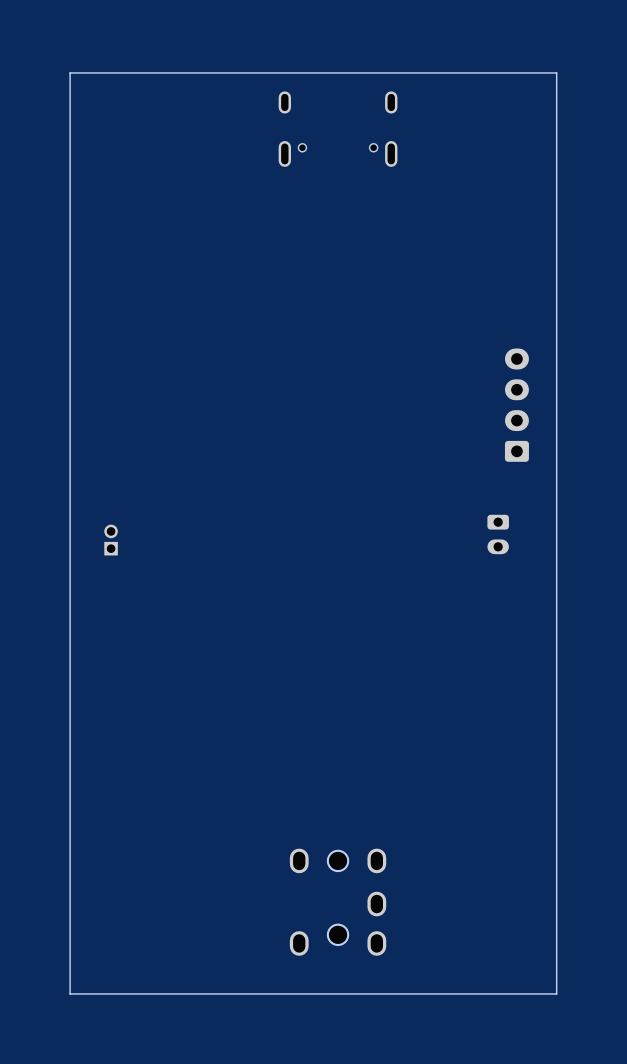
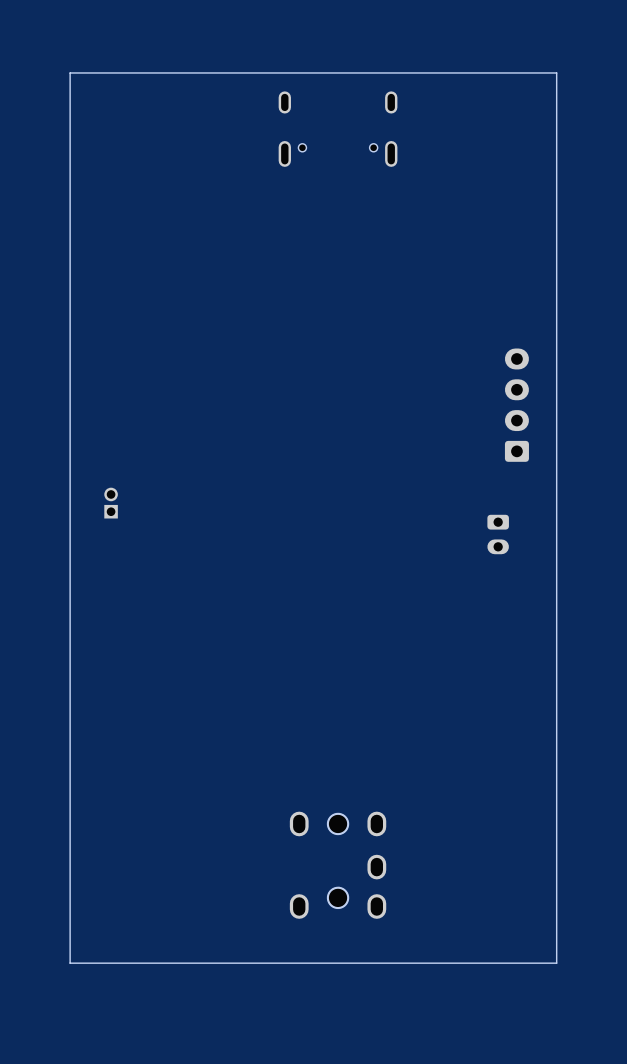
part position: (111, 540) -> (111, 503)
part position: (338, 902) -> (338, 865)
board edge: (556, 963) (556, 993) (70, 993) (70, 963) -> (556, 963) (70, 963)

